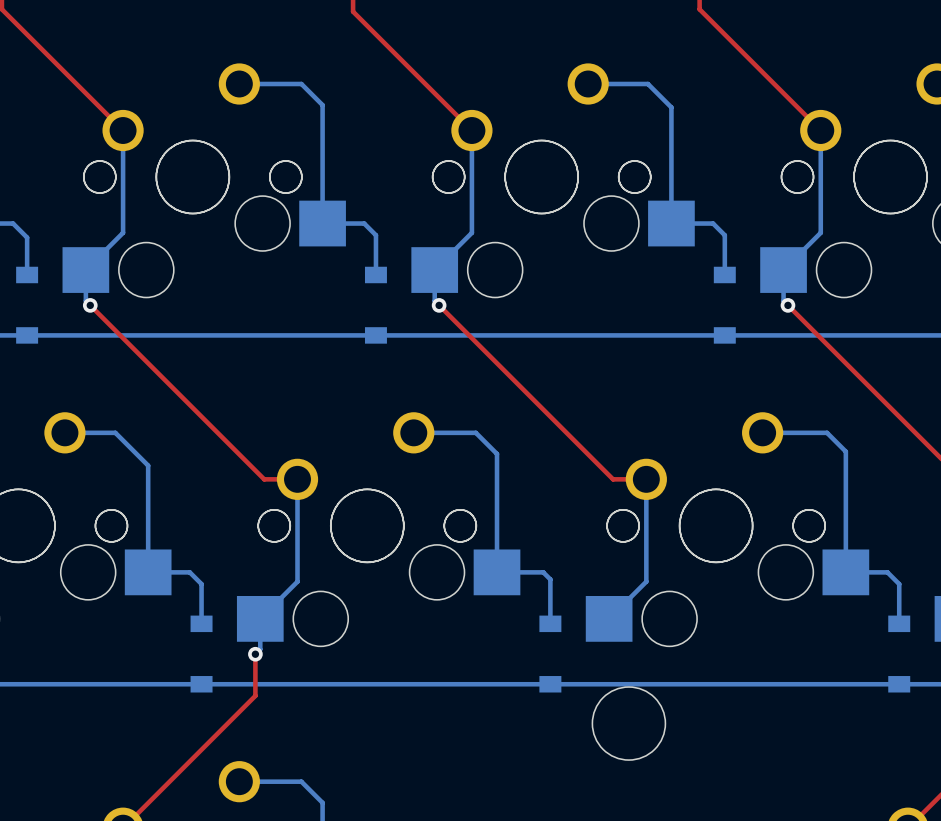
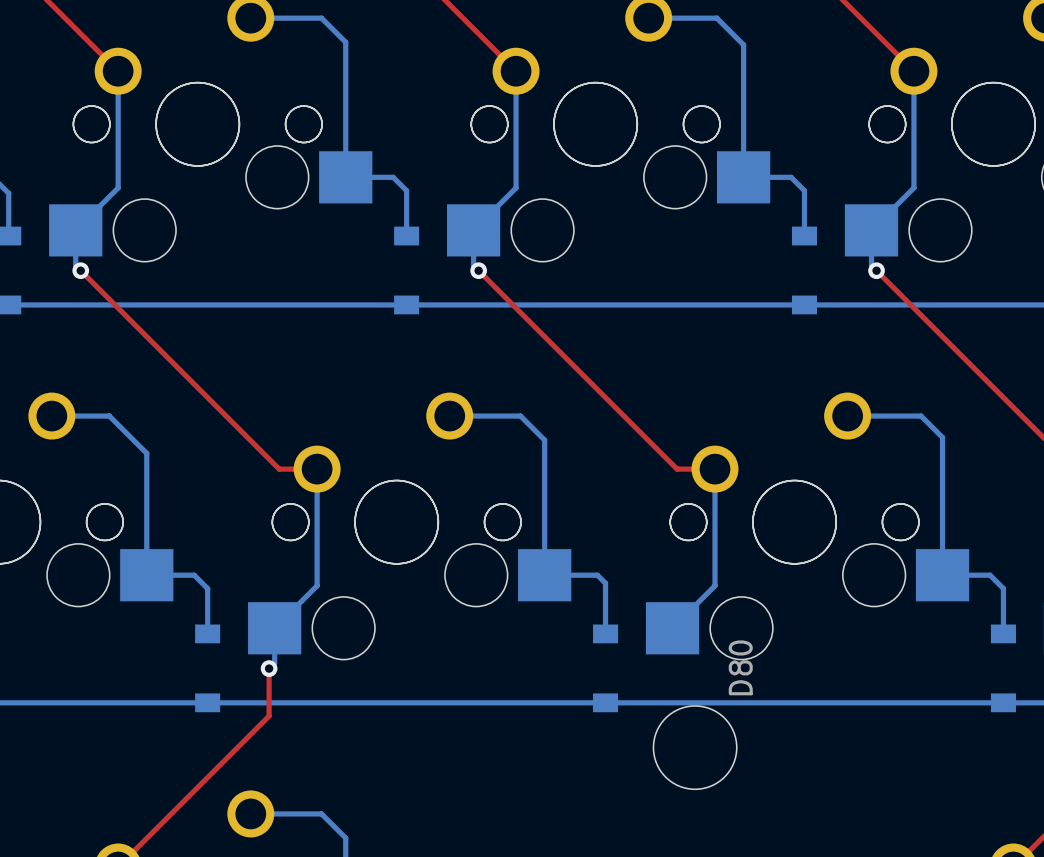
D80 name: none -> D80 (740, 667)

